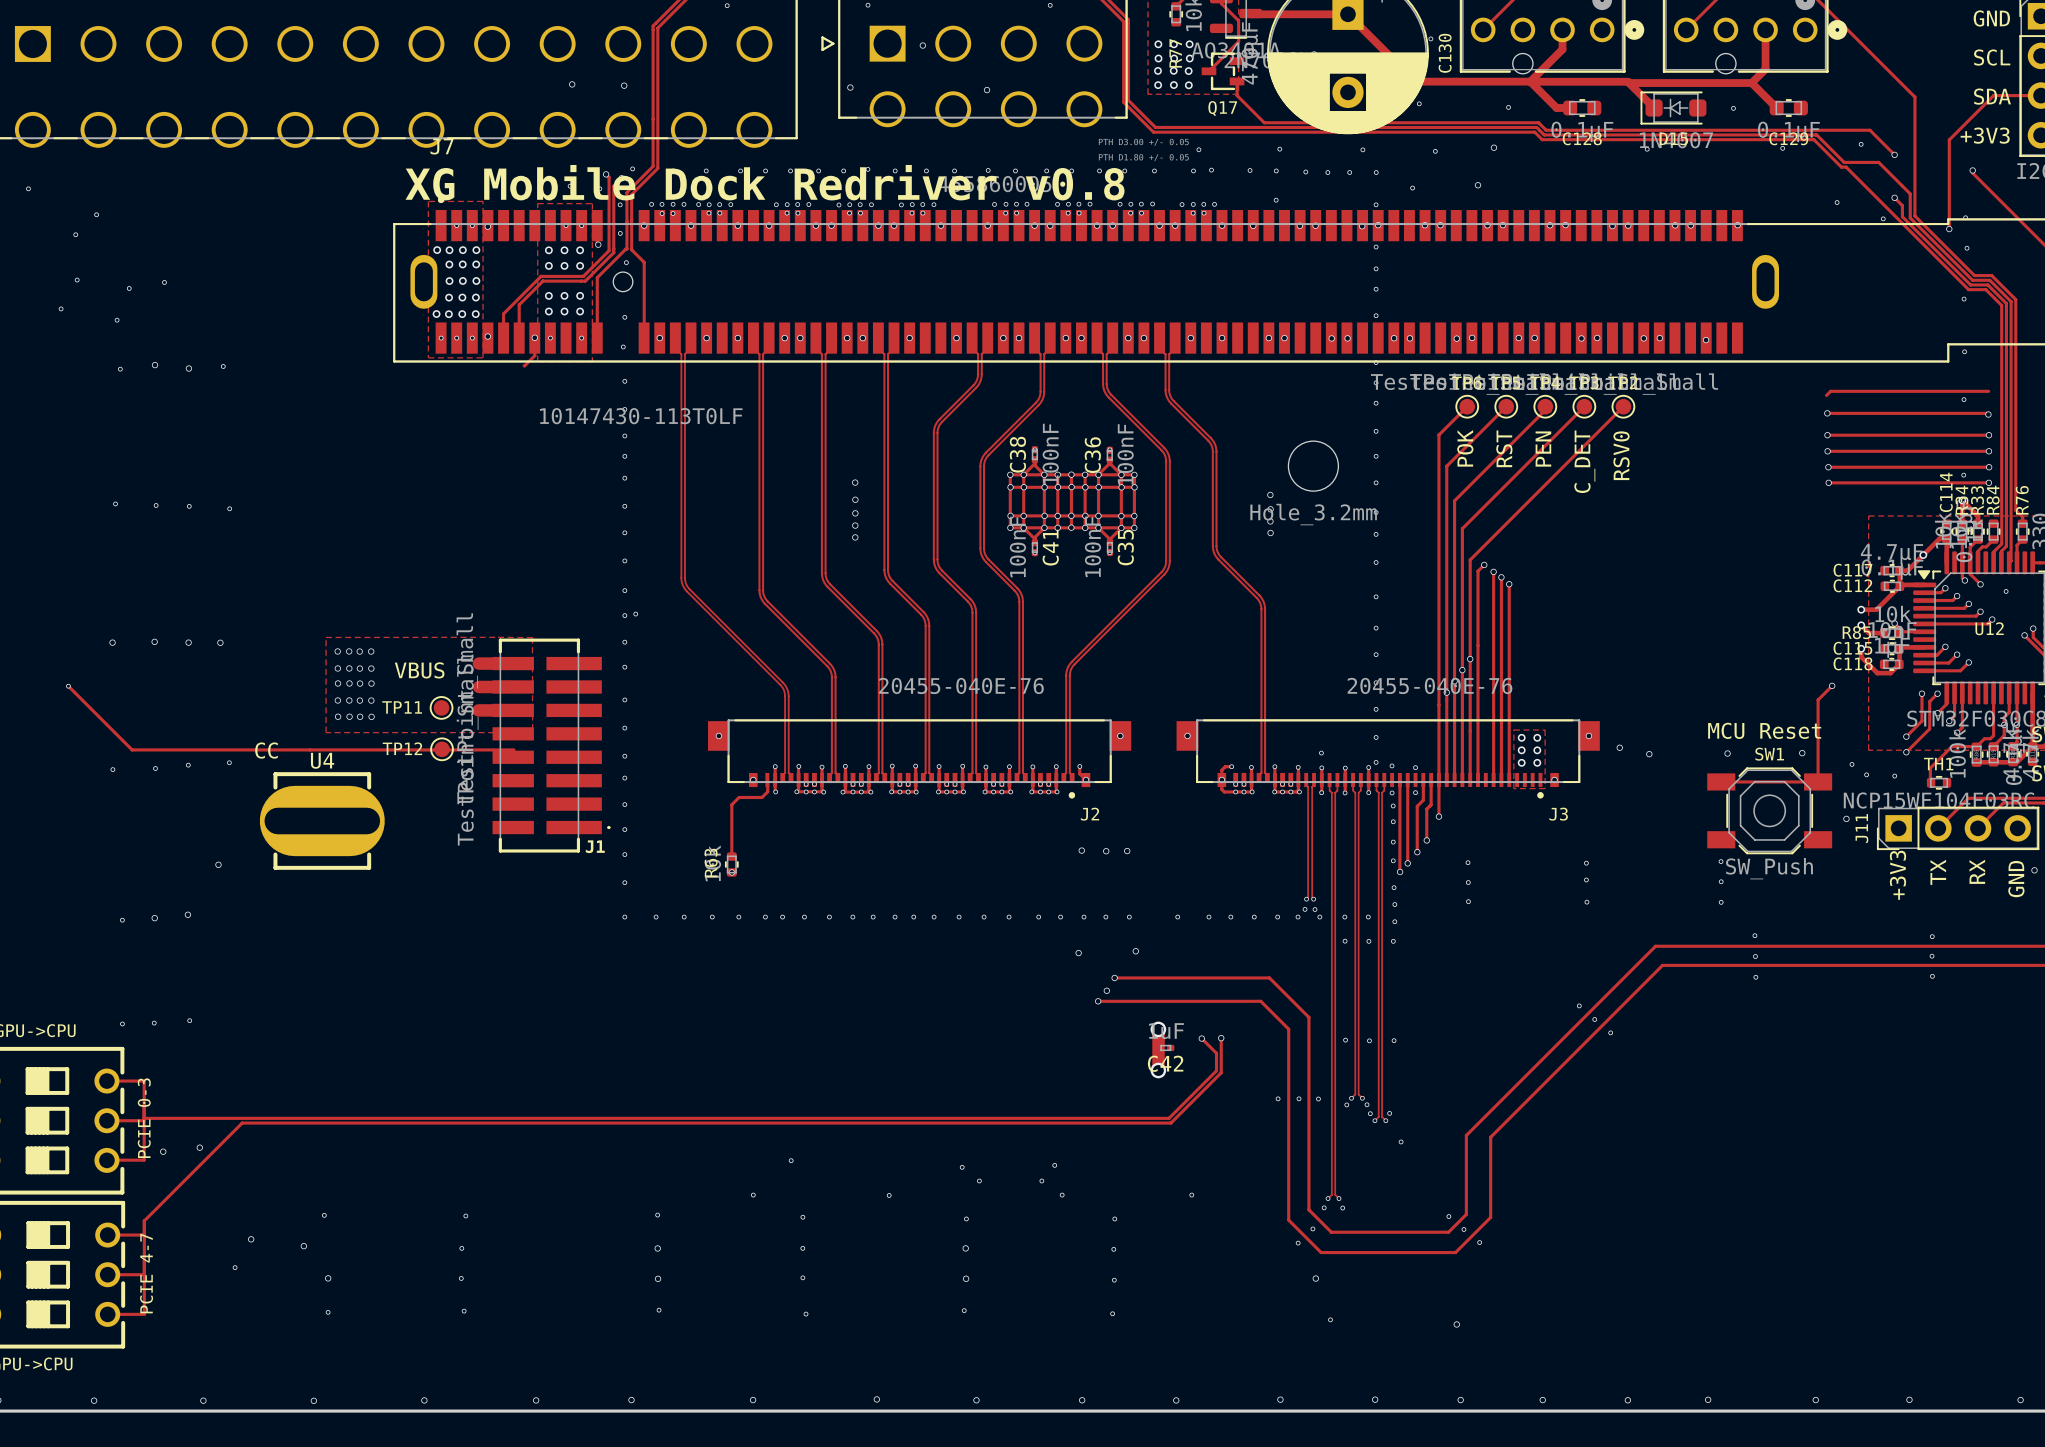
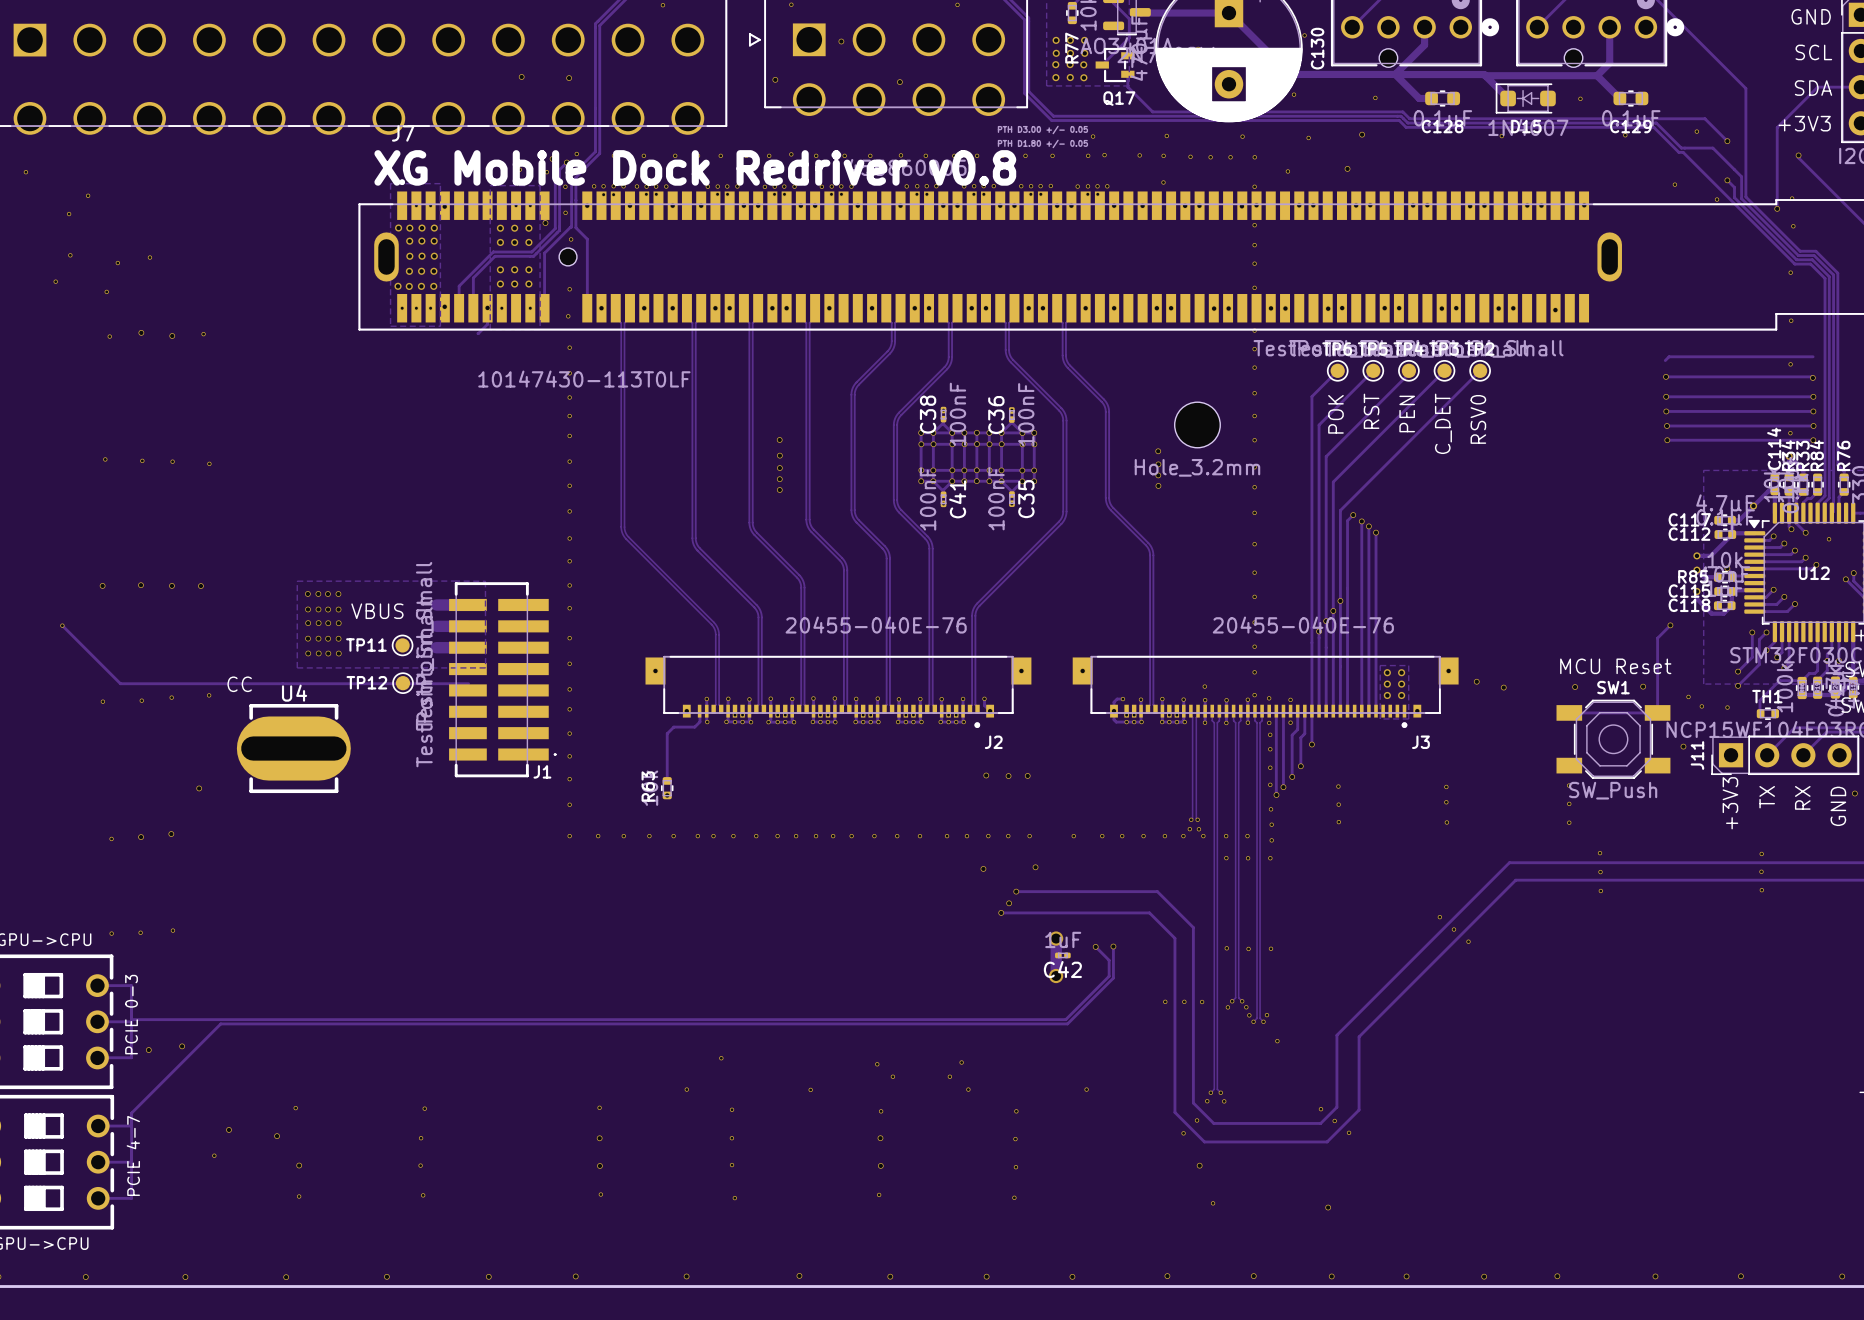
via: (635, 614) -> none

